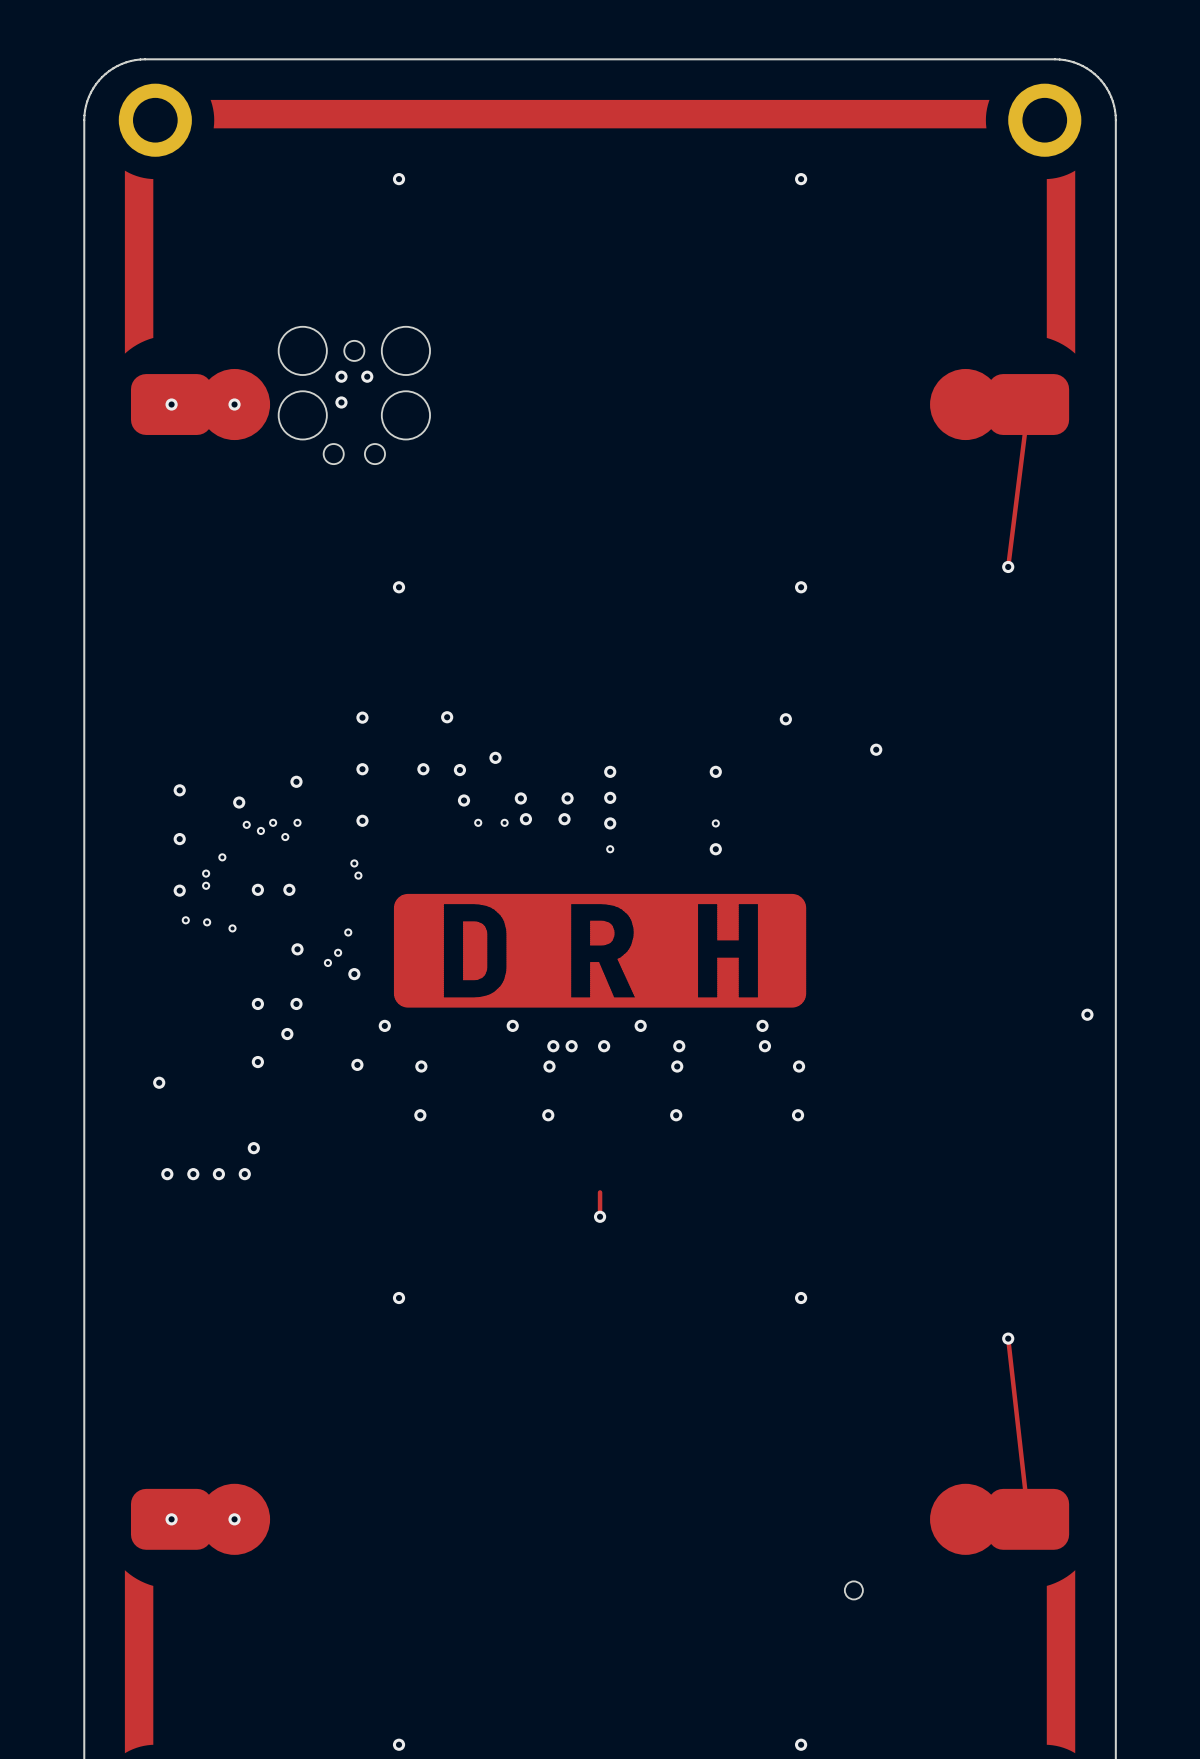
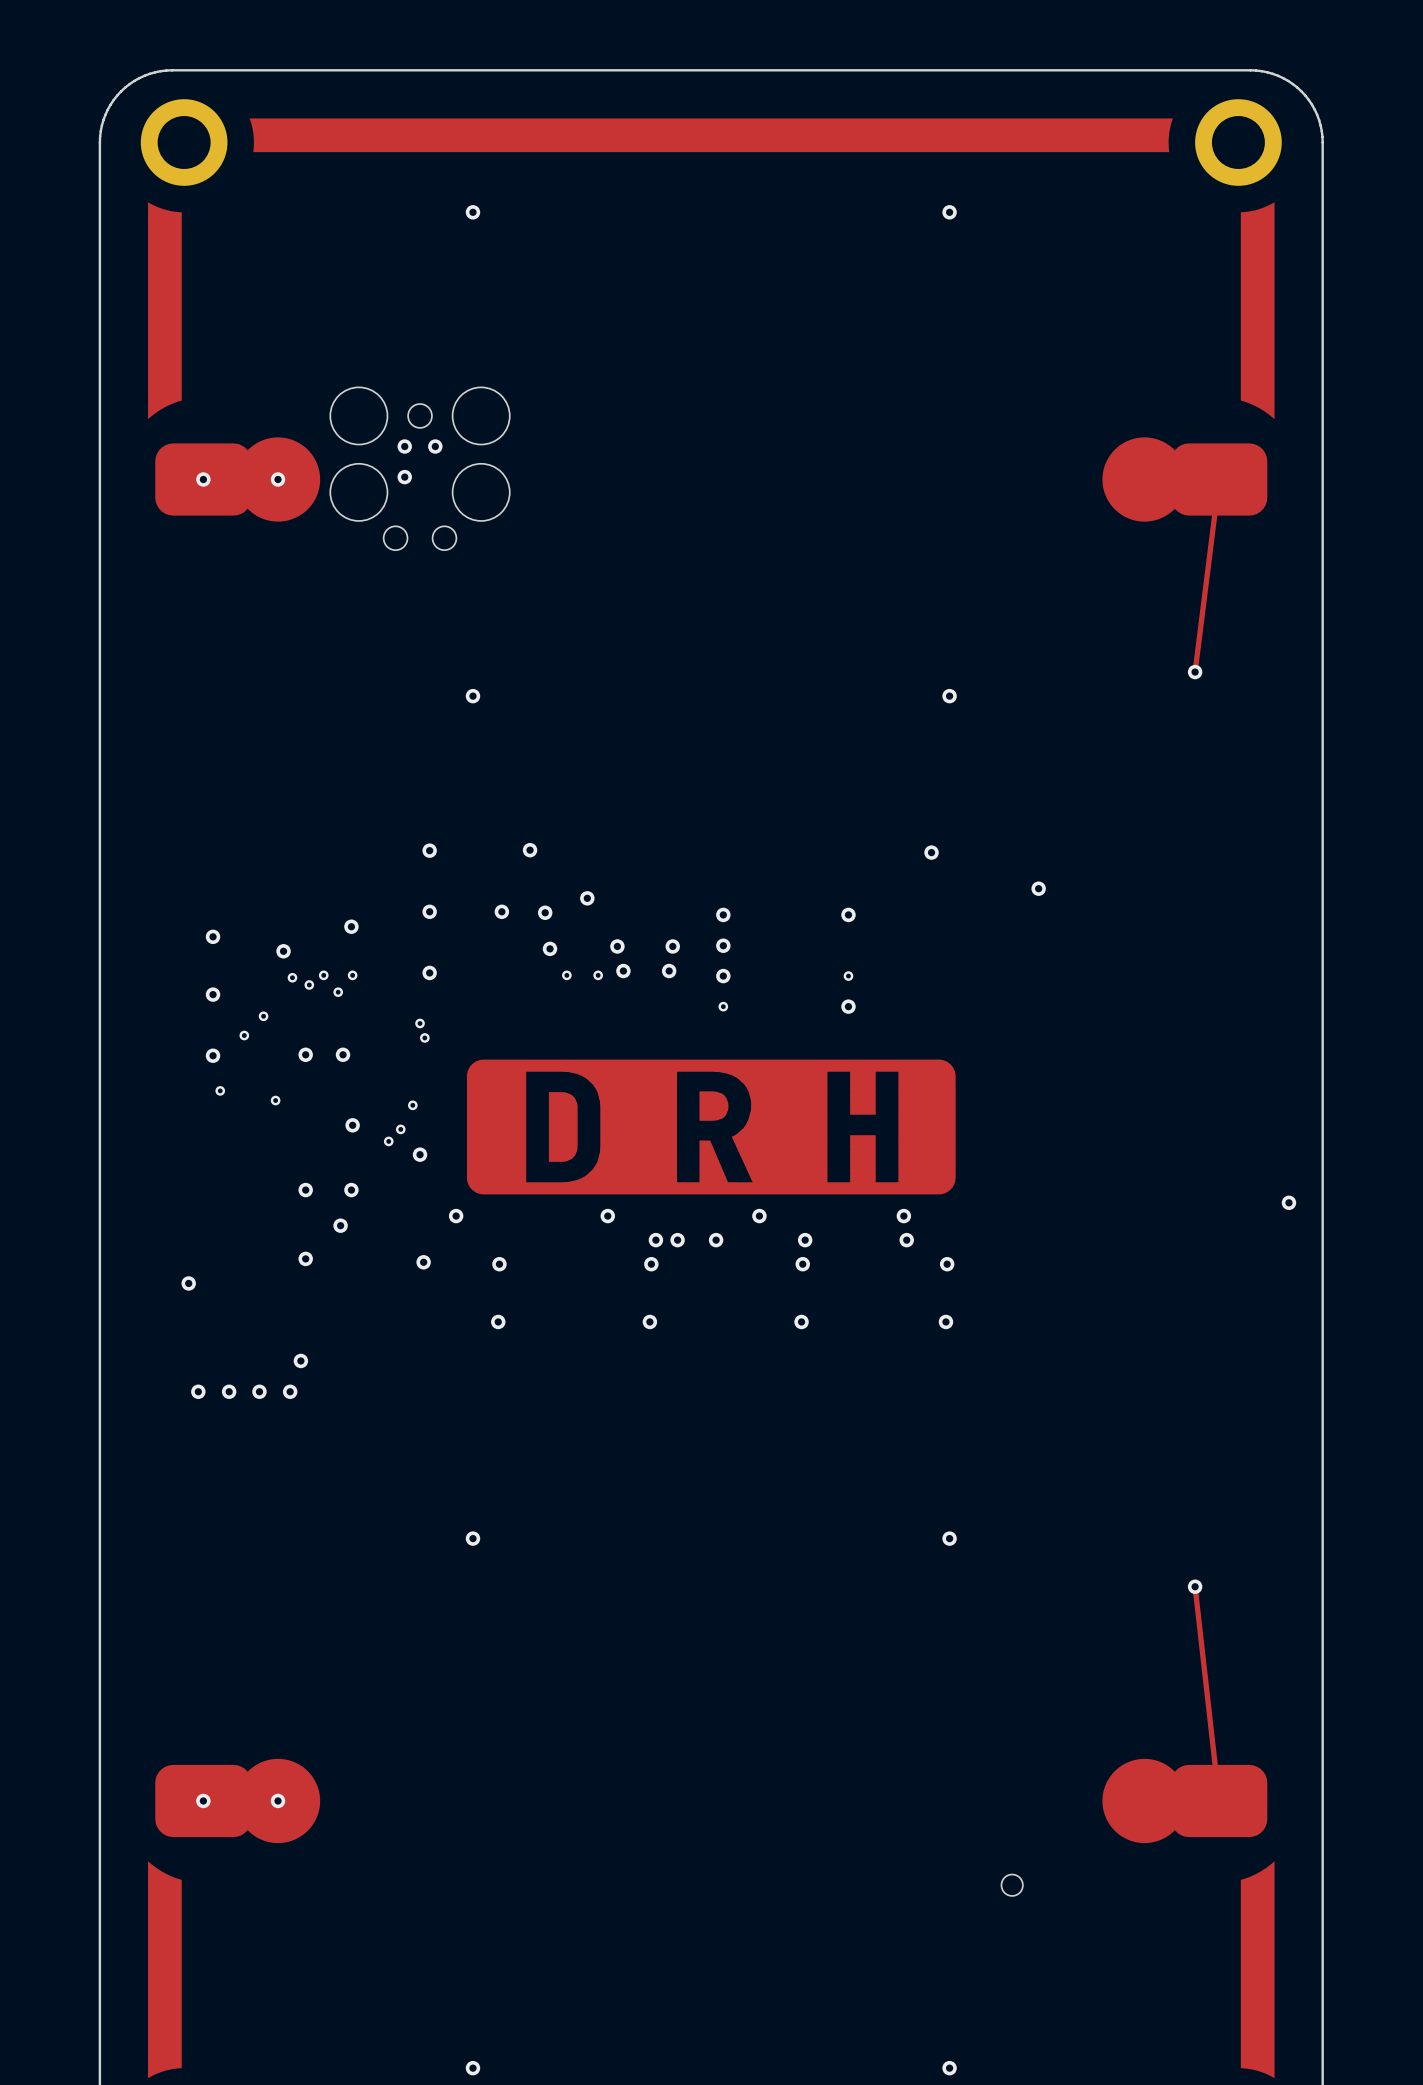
via: (206, 885) -> none
via: (207, 922) -> none
track: (600, 1192) (600, 1216) -> none
via: (600, 1216) -> none

